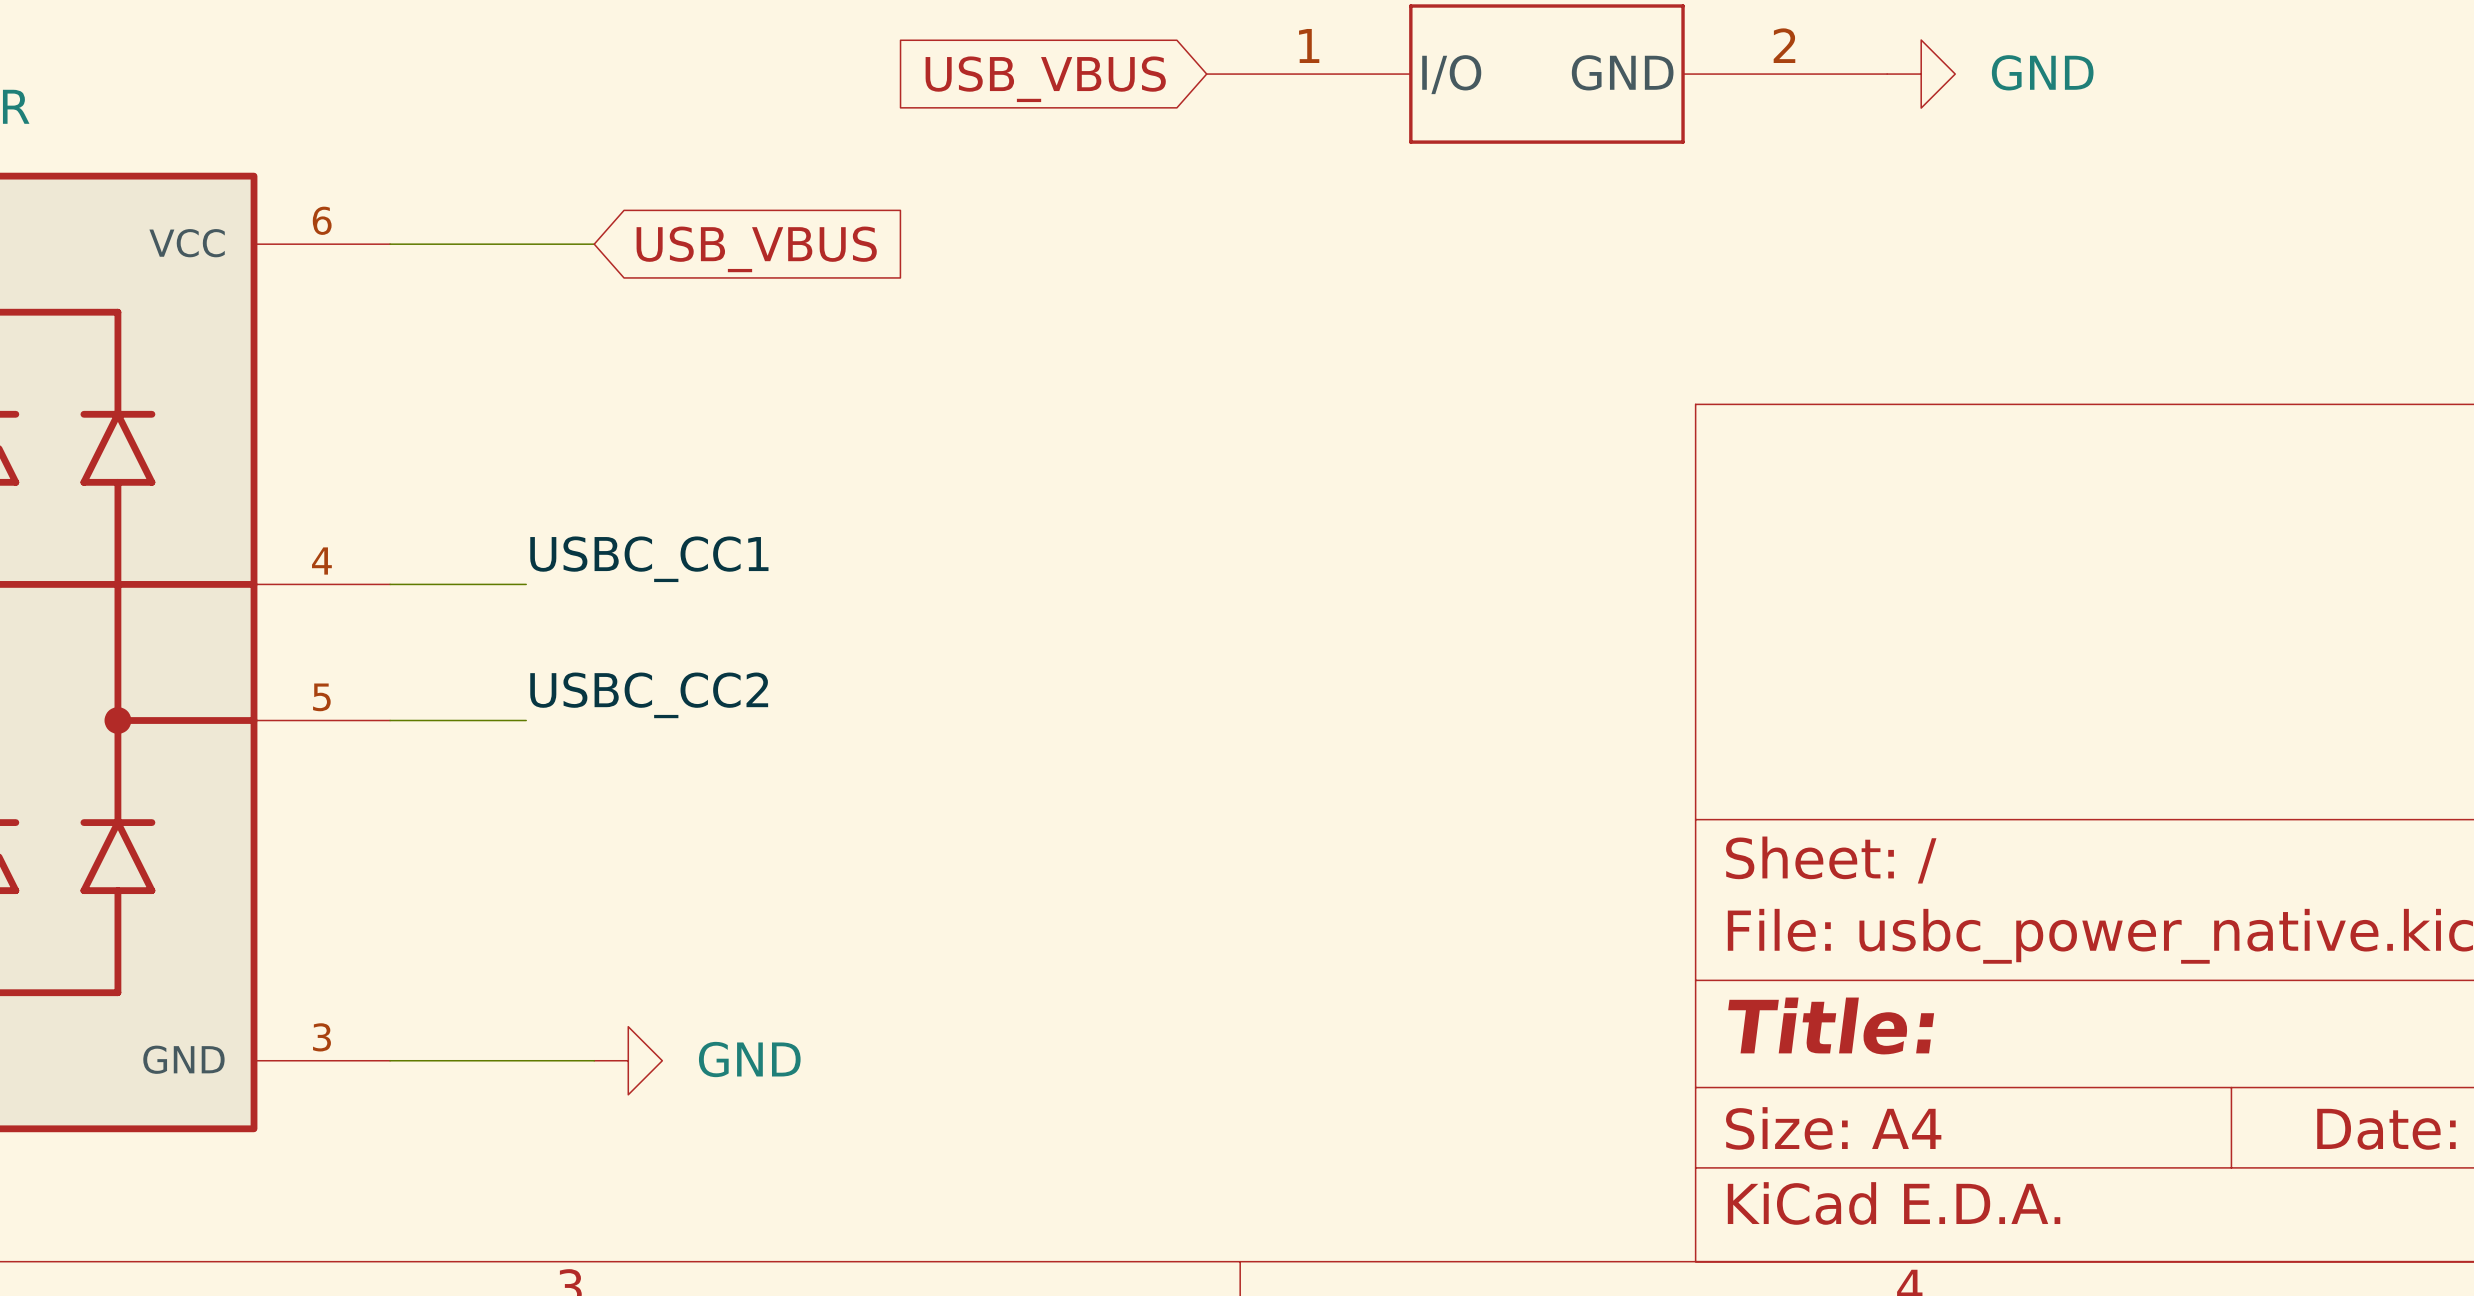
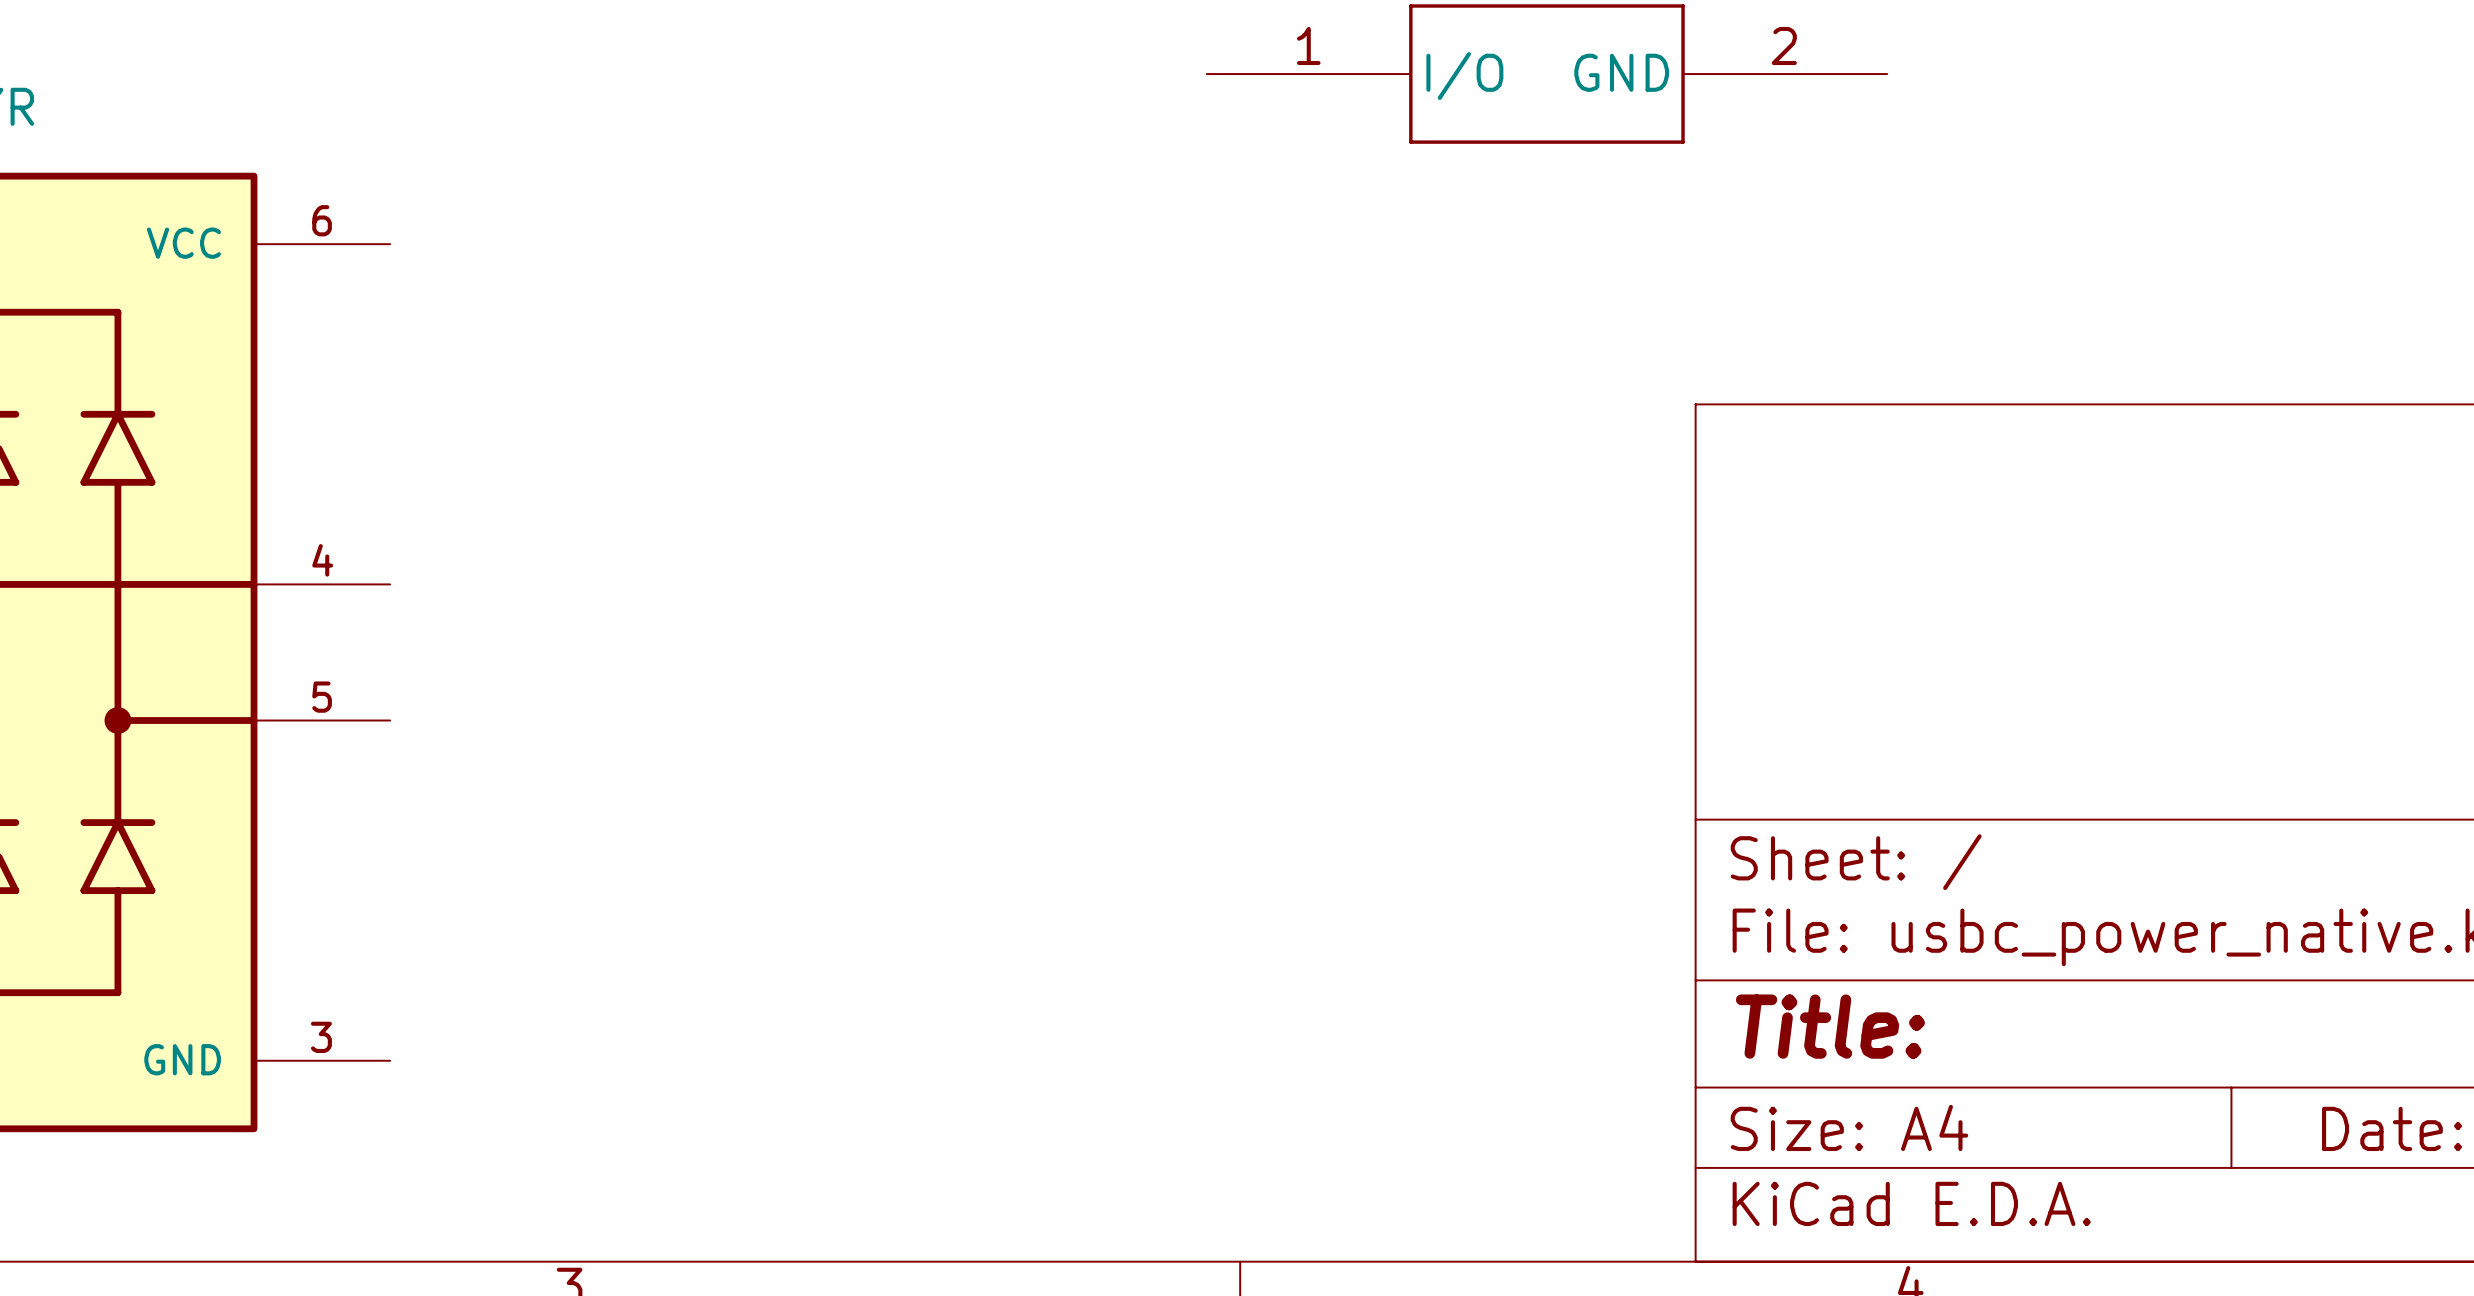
power symbol: GND (1921, 74) -> none
global label: USB_VBUS (1045, 79) -> none
wire: (390, 244) (594, 244) -> none
global label: USB_VBUS (756, 249) -> none
label: USBC_CC1 (649, 559) -> none
wire: (390, 584) (526, 584) -> none
label: USBC_CC2 (649, 695) -> none
wire: (390, 720) (526, 720) -> none
wire: (390, 1060) (594, 1060) -> none
power symbol: GND (628, 1060) -> none

